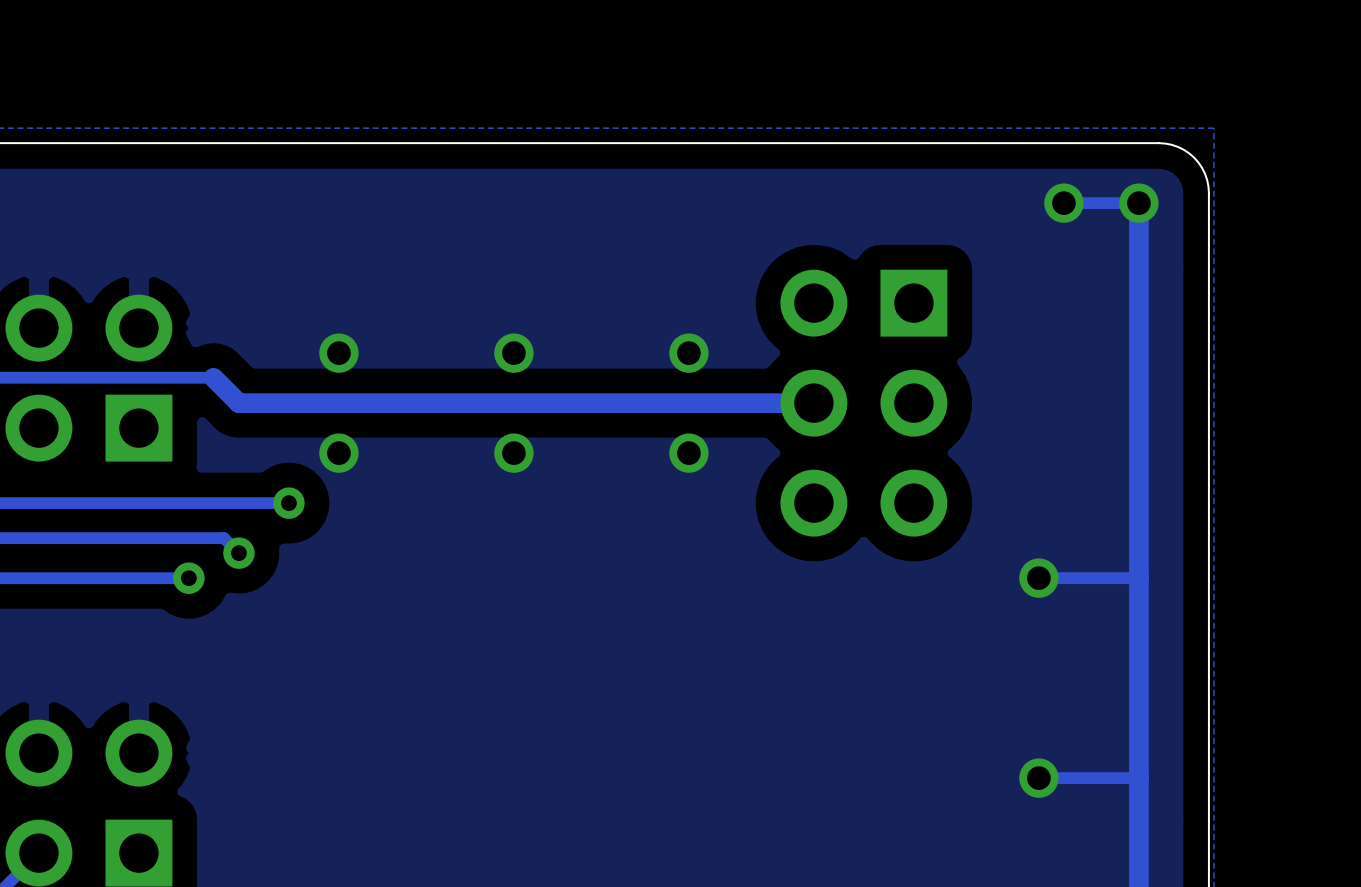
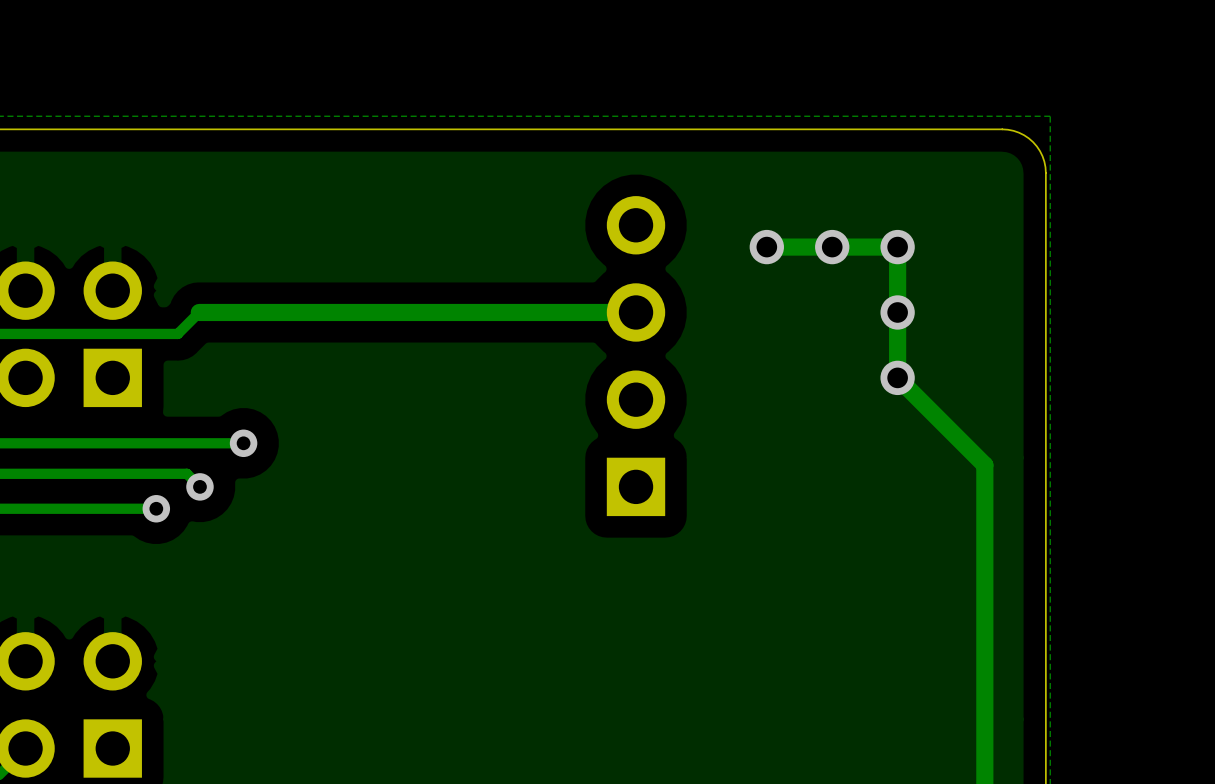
track: (1063, 203) (1138, 203) (1138, 528) -> (766, 247) (897, 247) (897, 377) (984, 465)
via: (1063, 203) -> none
via: (1138, 203) -> none
via: none -> (766, 247)
via: none -> (832, 247)
via: none -> (897, 247)
via: (338, 353) -> none
via: (513, 353) -> none
via: (688, 353) -> none
via: none -> (897, 312)
track: (213, 377) (238, 403) (813, 403) -> (177, 333) (199, 312) (636, 312)
part: none -> (636, 356)
part: (863, 403) -> none
via: none -> (897, 377)
via: (338, 453) -> none
via: (513, 453) -> none
via: (688, 453) -> none
via: (1038, 578) -> none
track: (1138, 578) (1038, 578) -> none
via: (1038, 778) -> none
track: (1138, 778) (1038, 778) -> none

